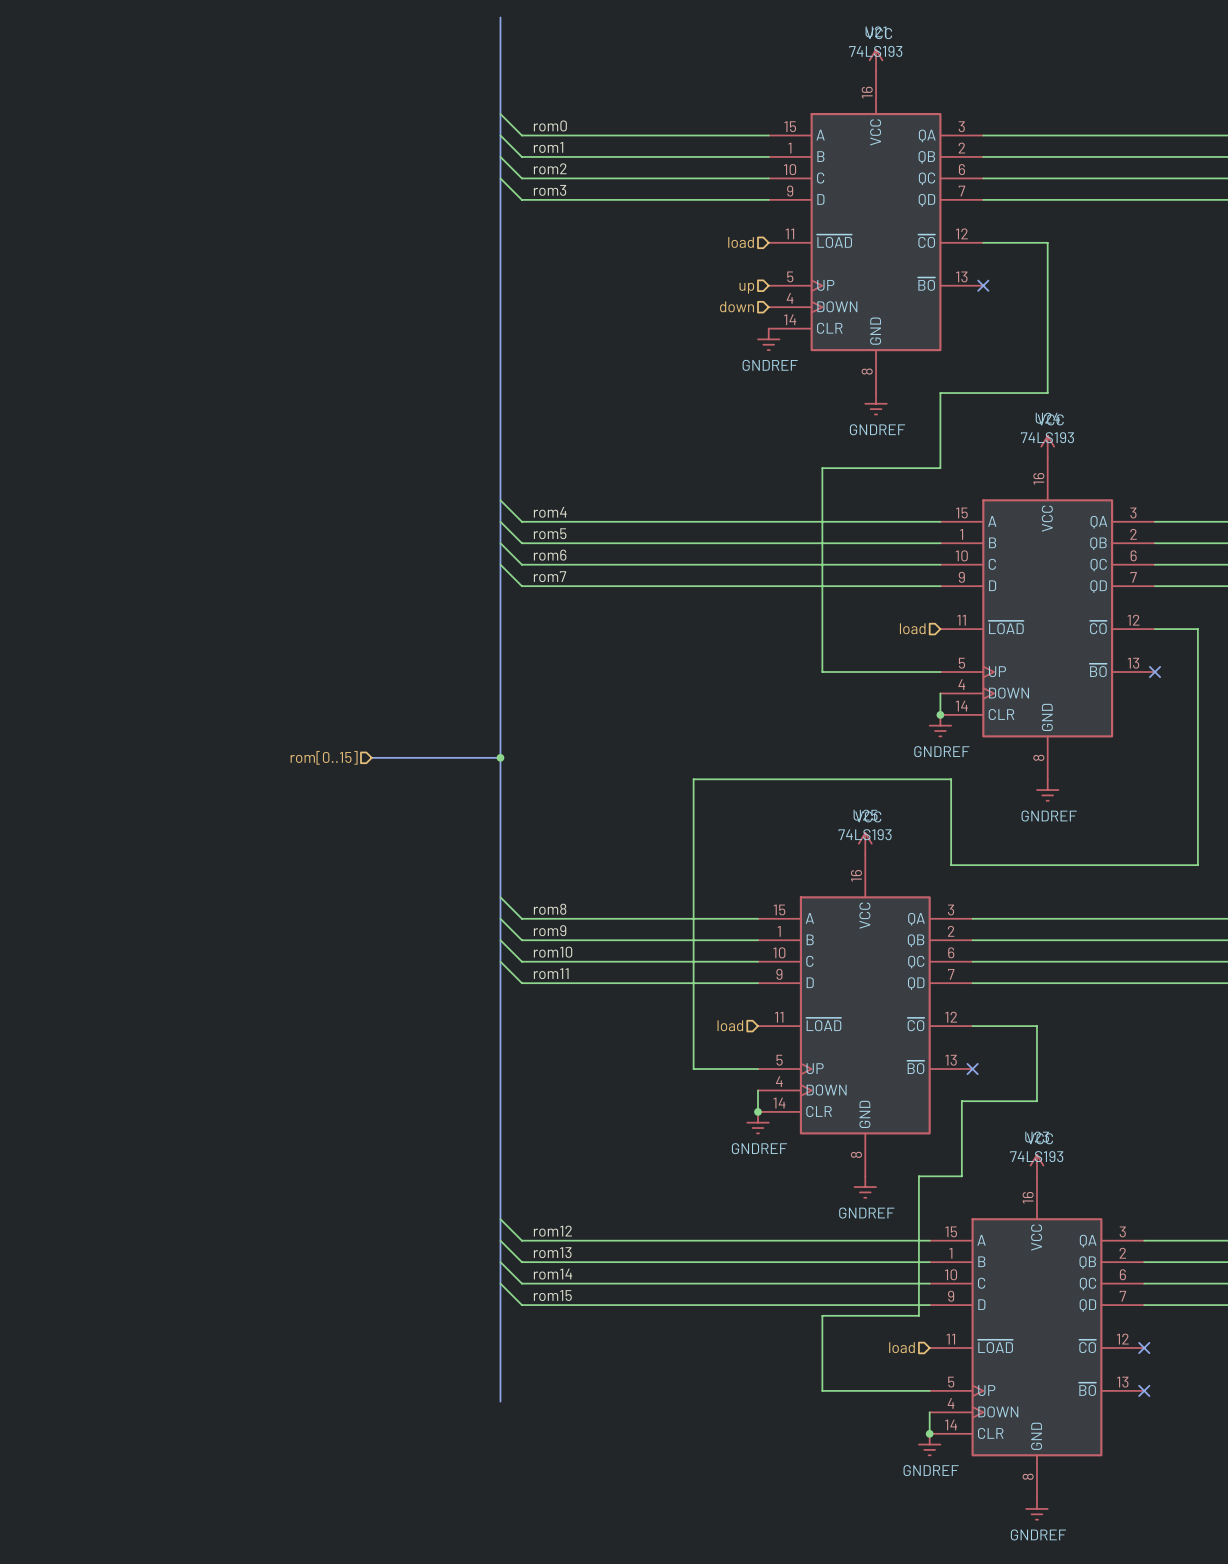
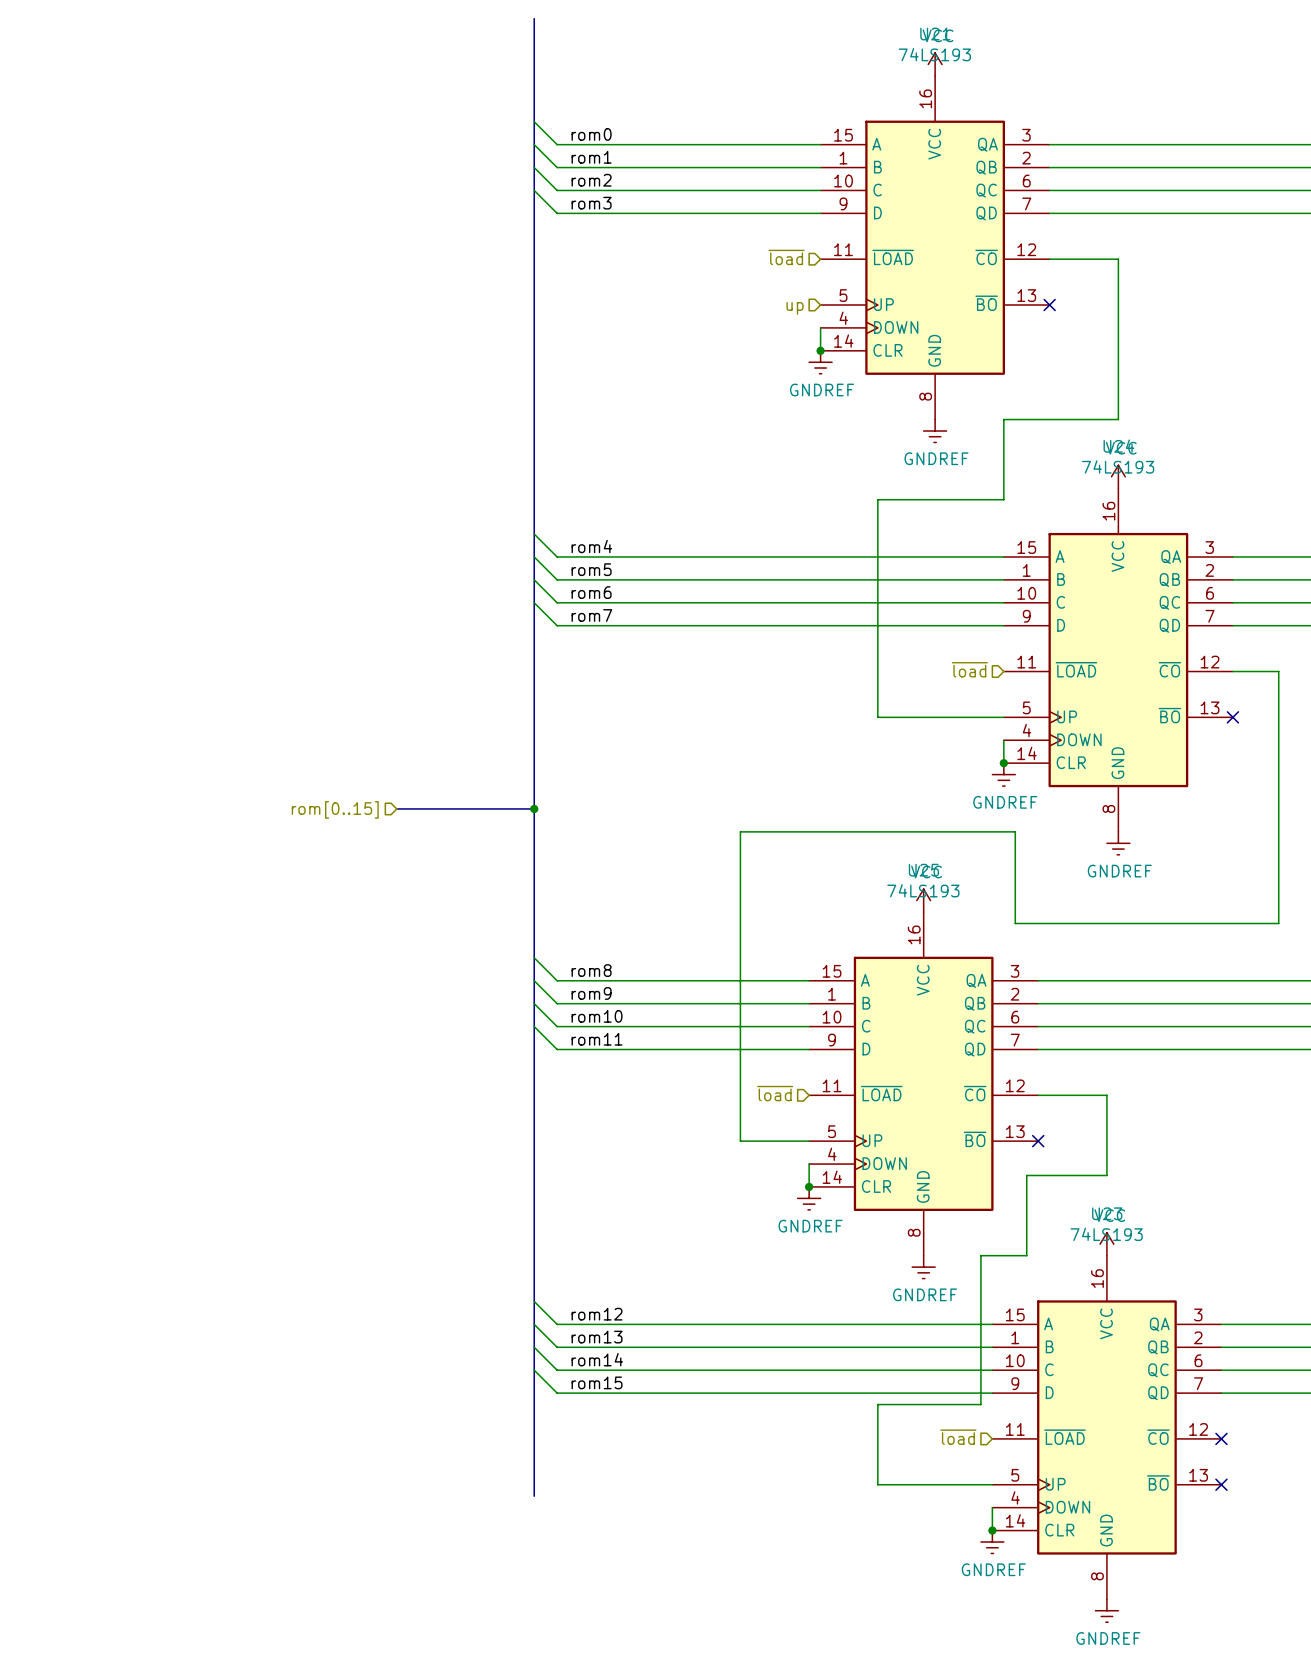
hierarchical label: load (741, 242) -> ~{load} (786, 257)
hierarchical label: down (737, 306) -> none
wire: none -> (820, 327) (820, 350)
junction: none -> (820, 350)
hierarchical label: load (912, 628) -> ~{load} (969, 669)
hierarchical label: load (730, 1025) -> ~{load} (775, 1093)
hierarchical label: load (902, 1347) -> ~{load} (958, 1437)

